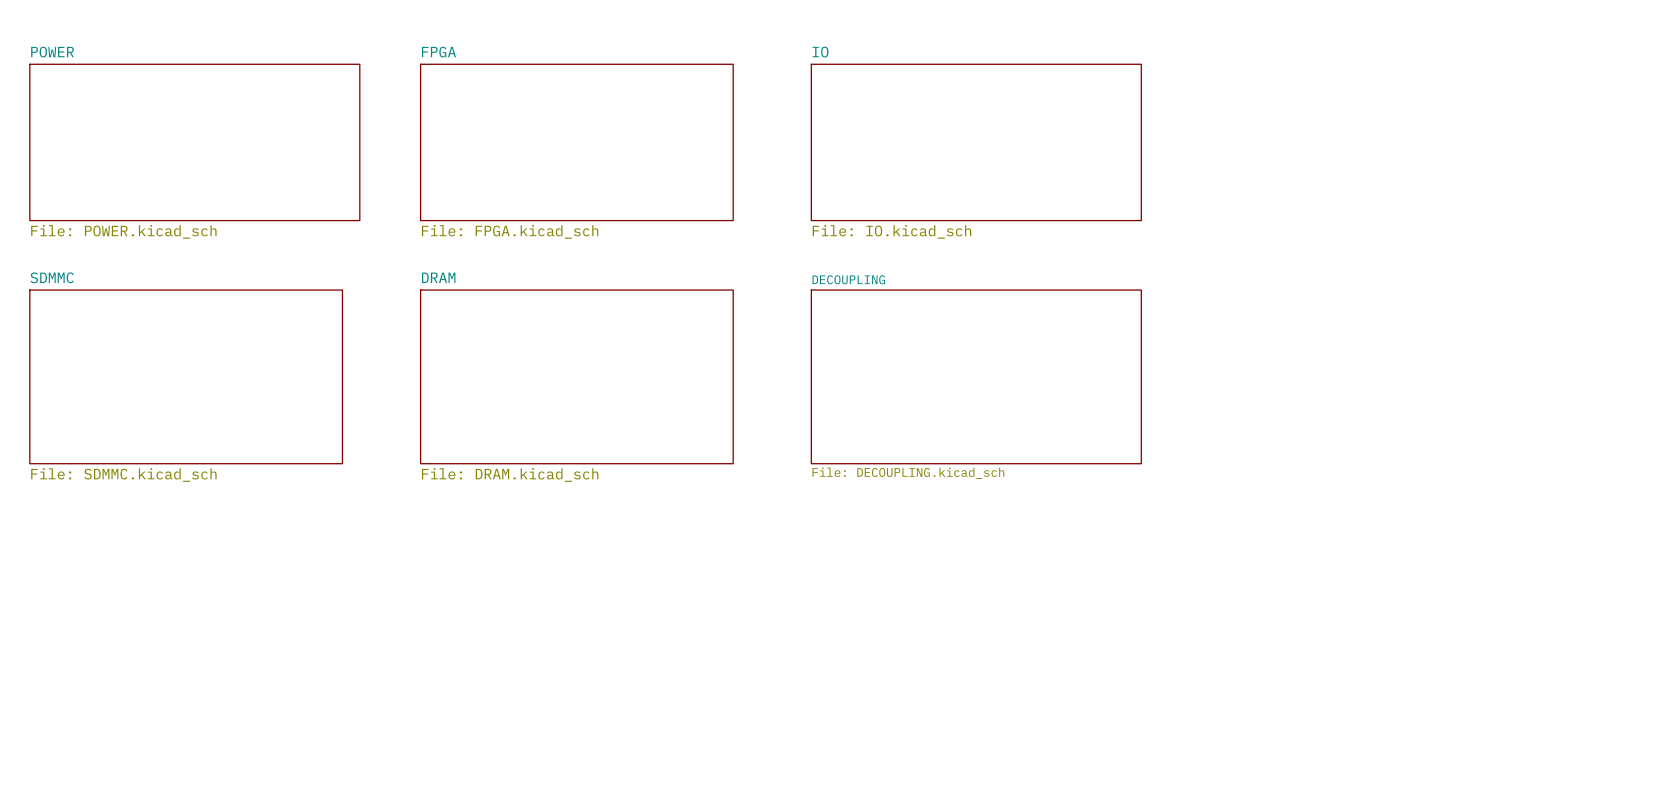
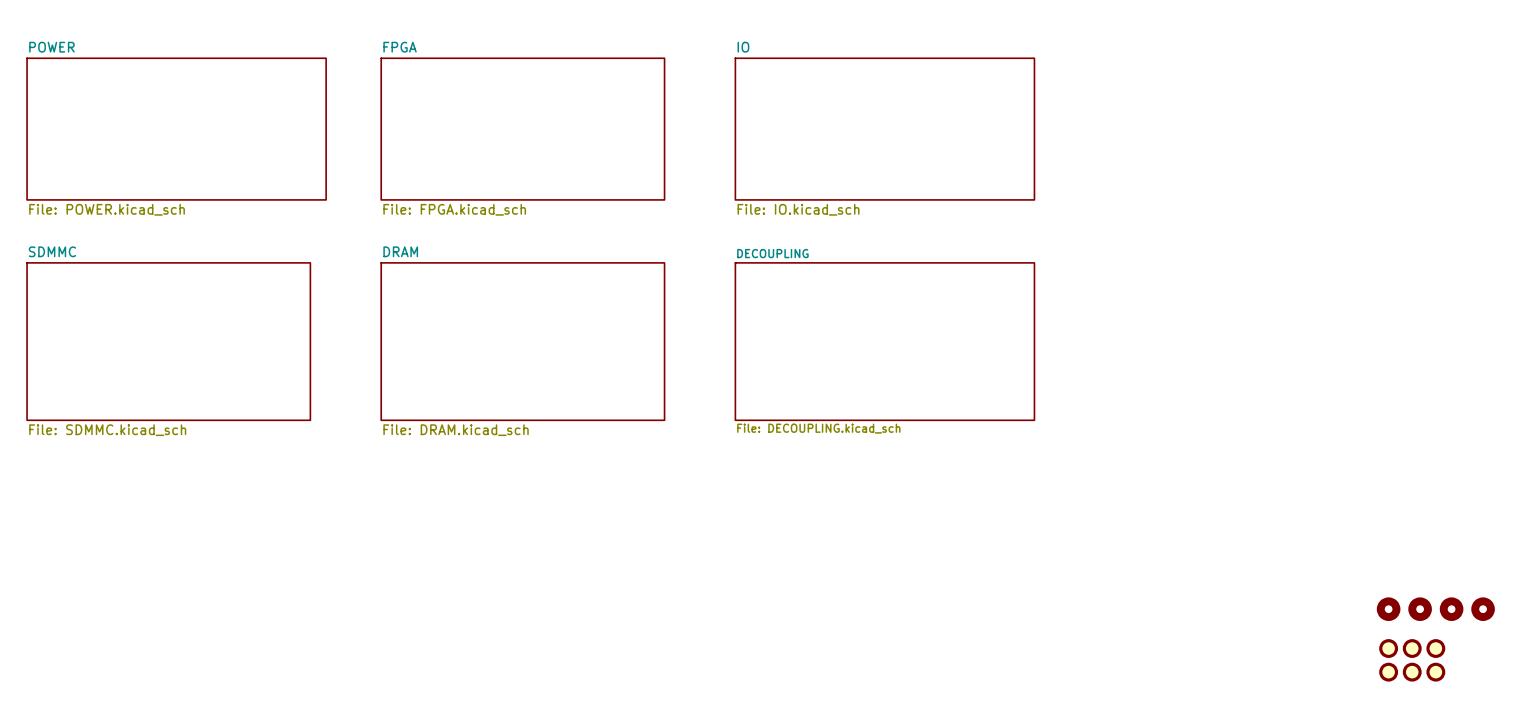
part: none -> (1388, 609)
part: none -> (1420, 609)
part: none -> (1451, 609)
part: none -> (1483, 609)
part: none -> (1388, 648)
part: none -> (1412, 648)
part: none -> (1435, 648)
part: none -> (1388, 672)
part: none -> (1412, 672)
part: none -> (1435, 672)

